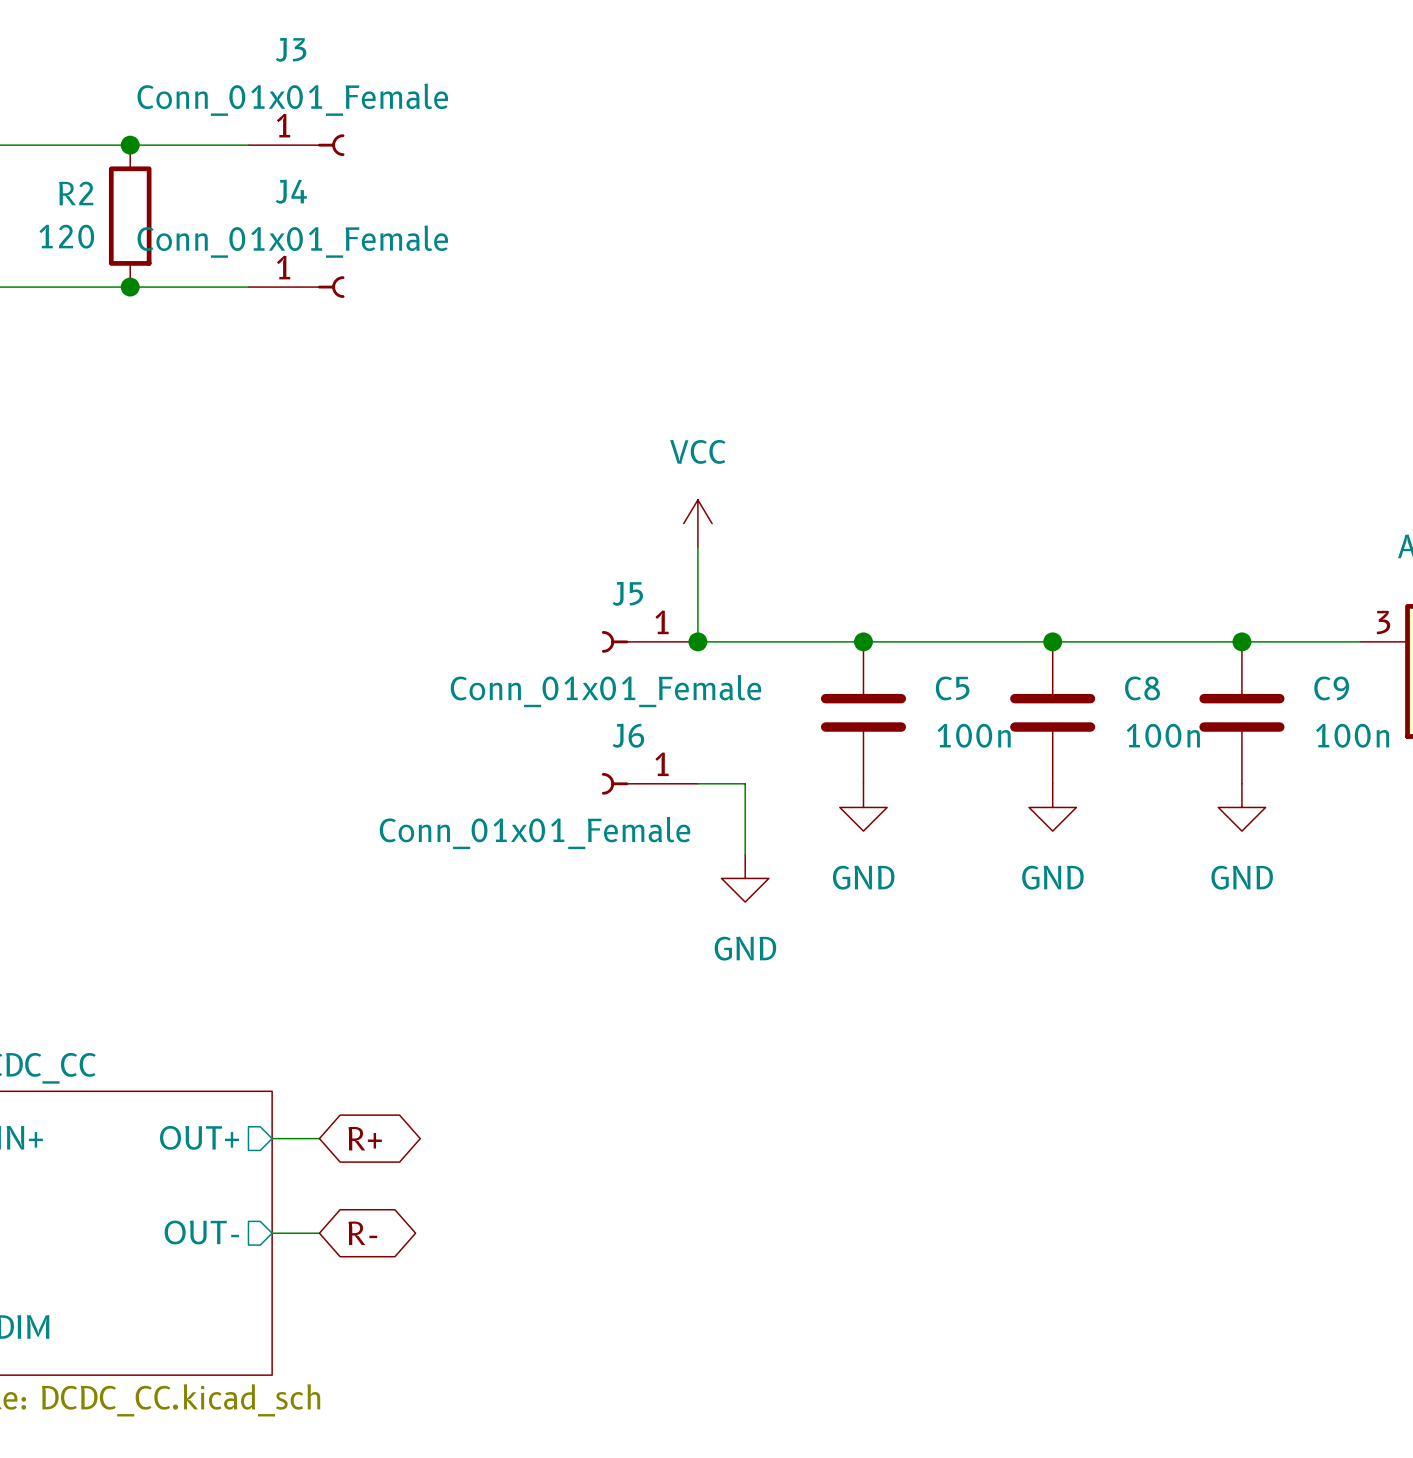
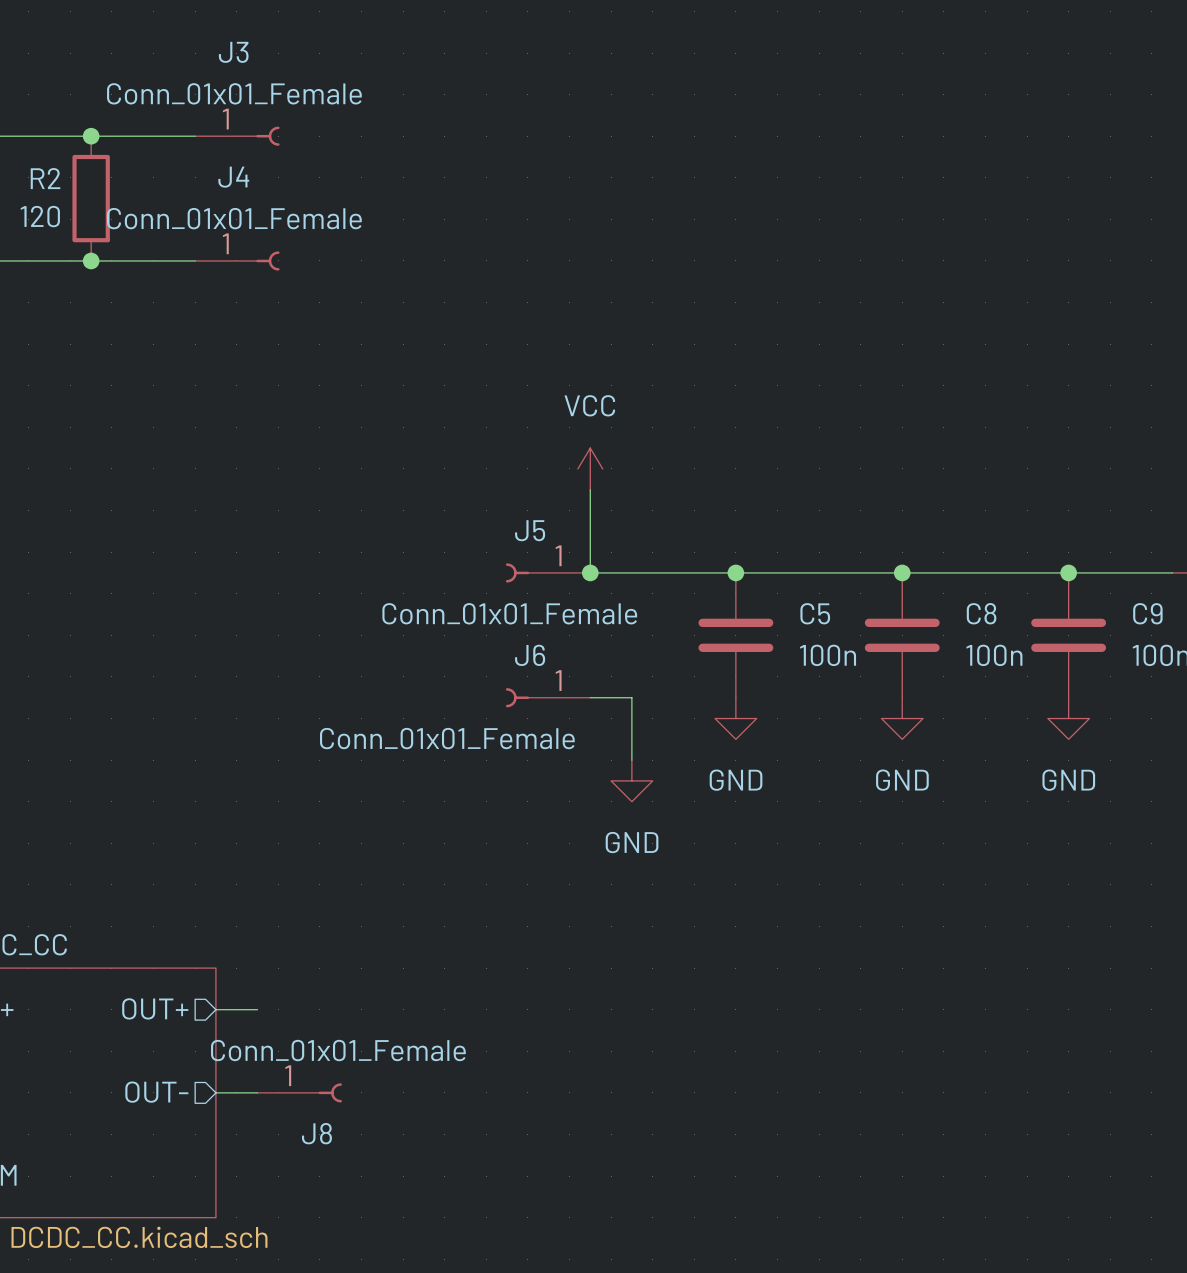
global label: R+ (365, 1138) -> none
global label: R- (362, 1233) -> none
J8: none -> Conn_01x01_Female (299, 1092)

